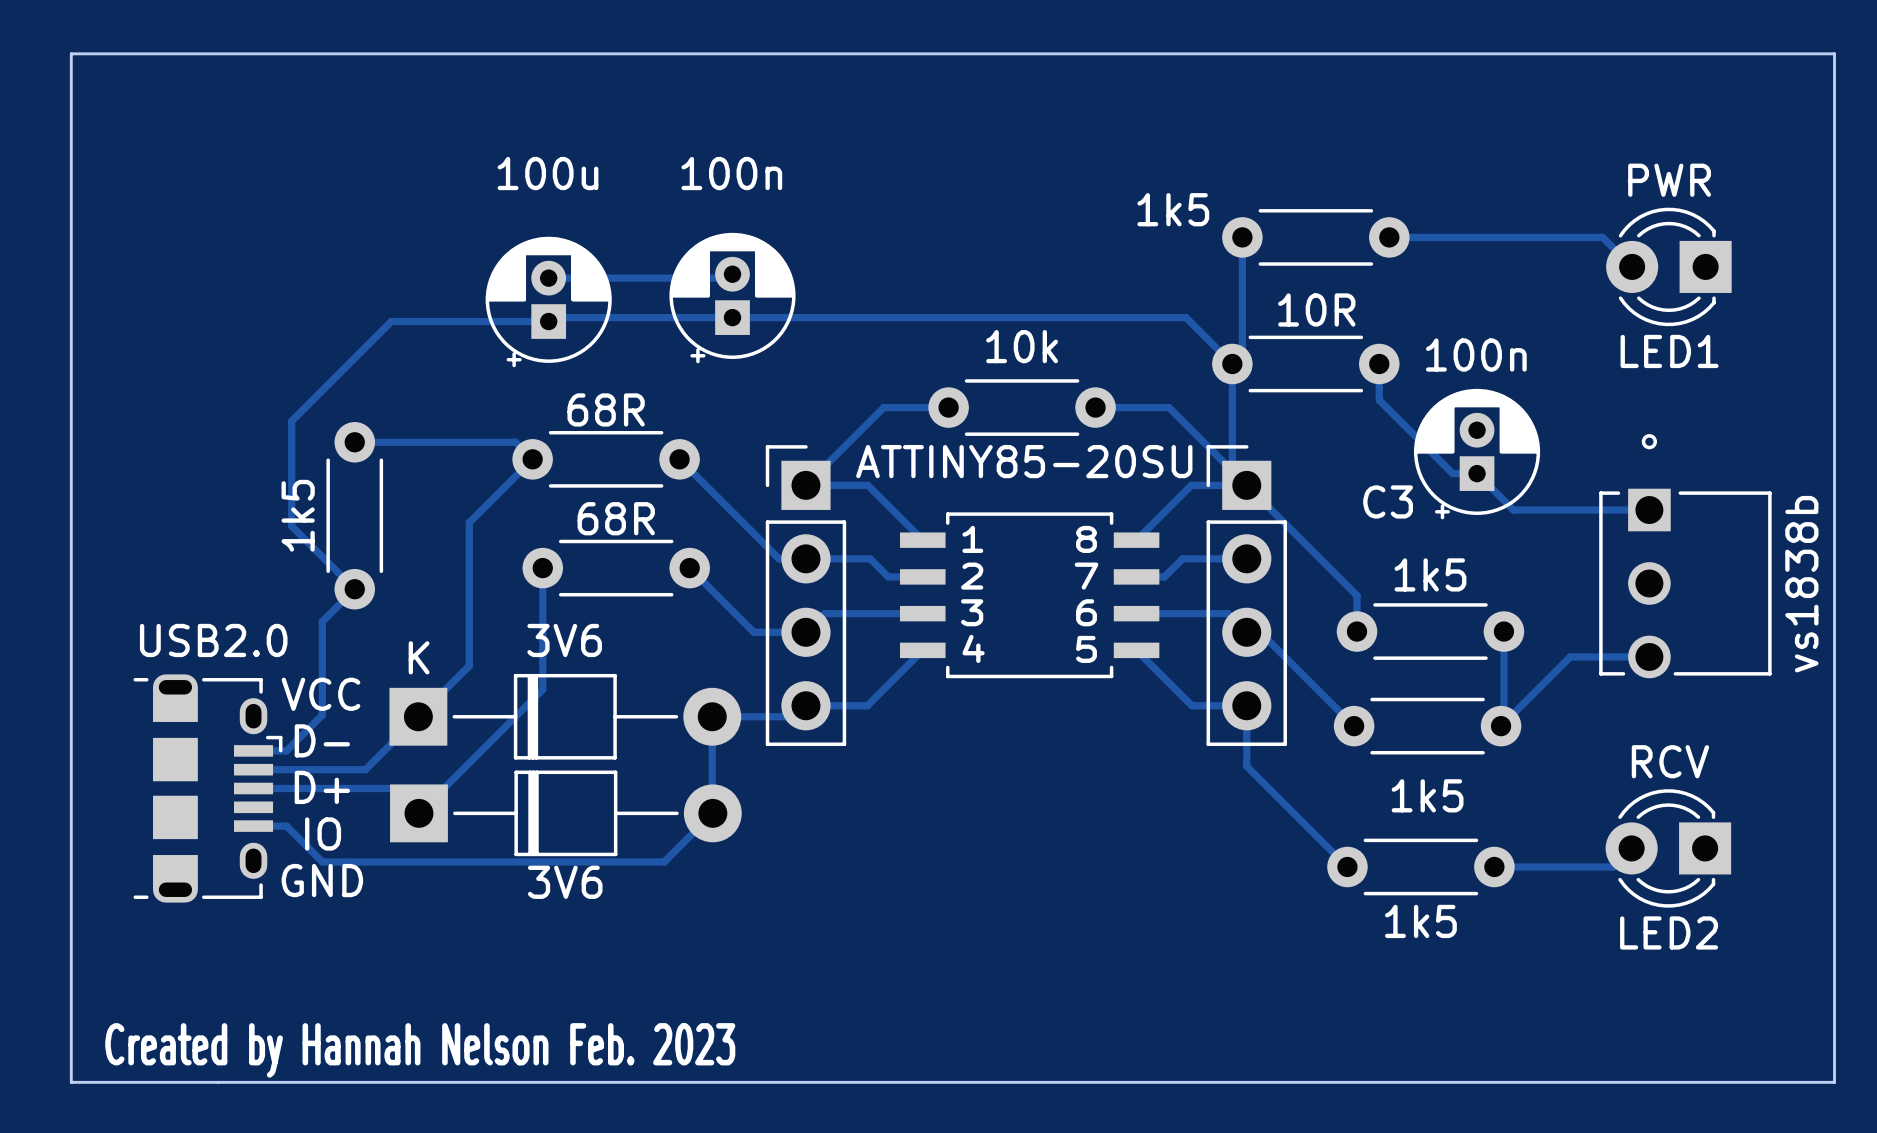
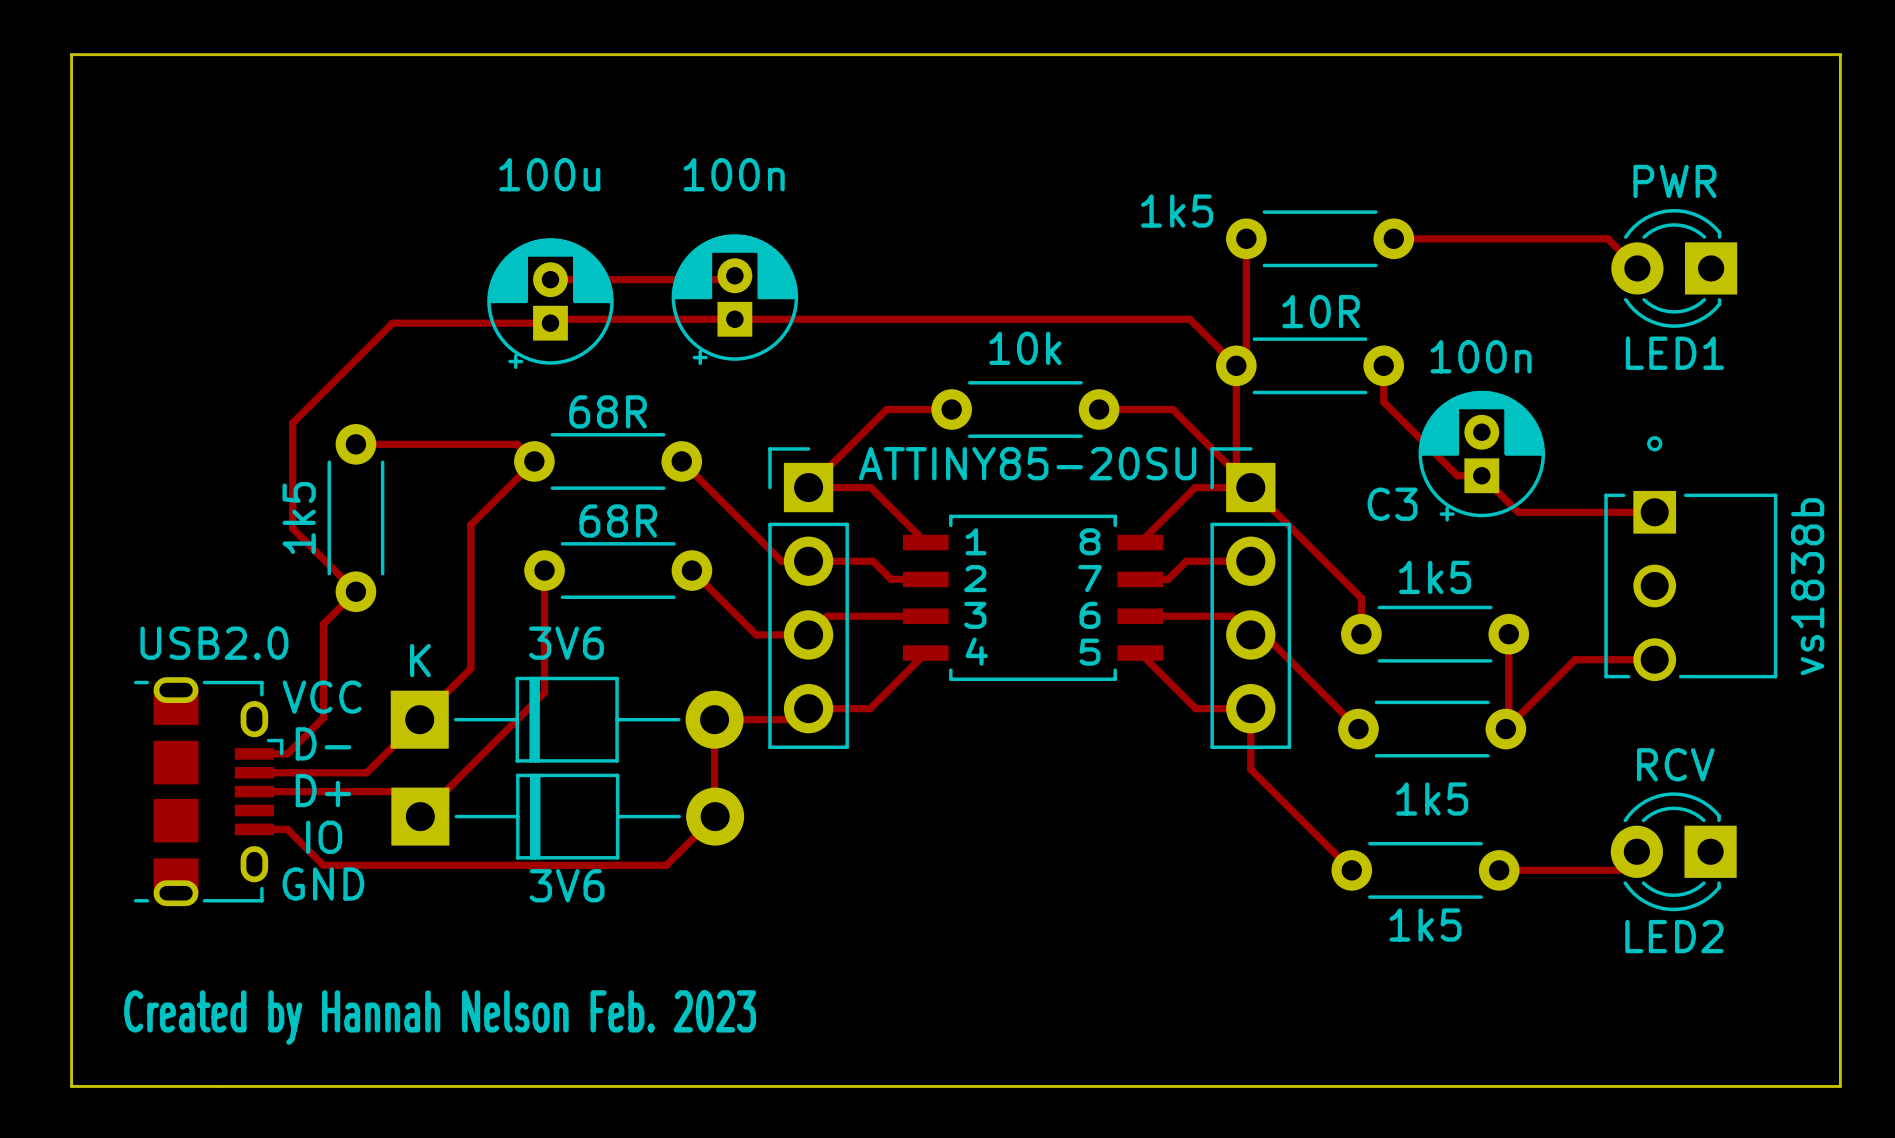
text: none -> Created by Hannah Nelson Feb. 2023 (440, 1017)
text: Created by Hannah Nelson Feb. 2023 (420, 1050) -> none

